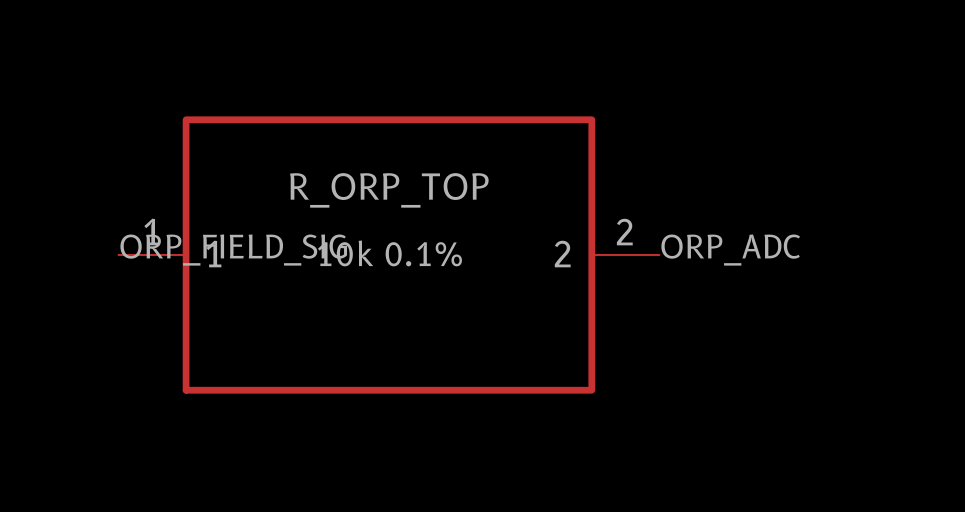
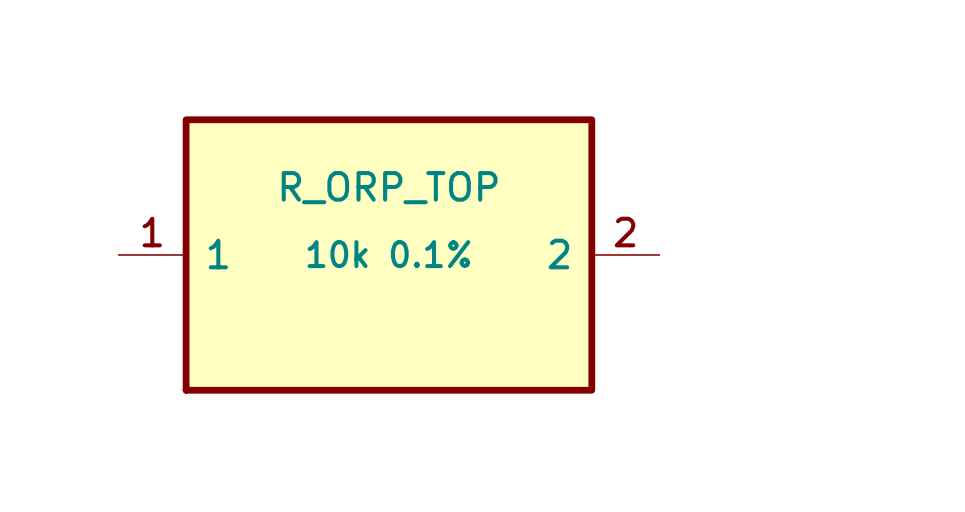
label: ORP_FIELD_SIG (233, 250) -> none
label: ORP_ADC (730, 250) -> none

